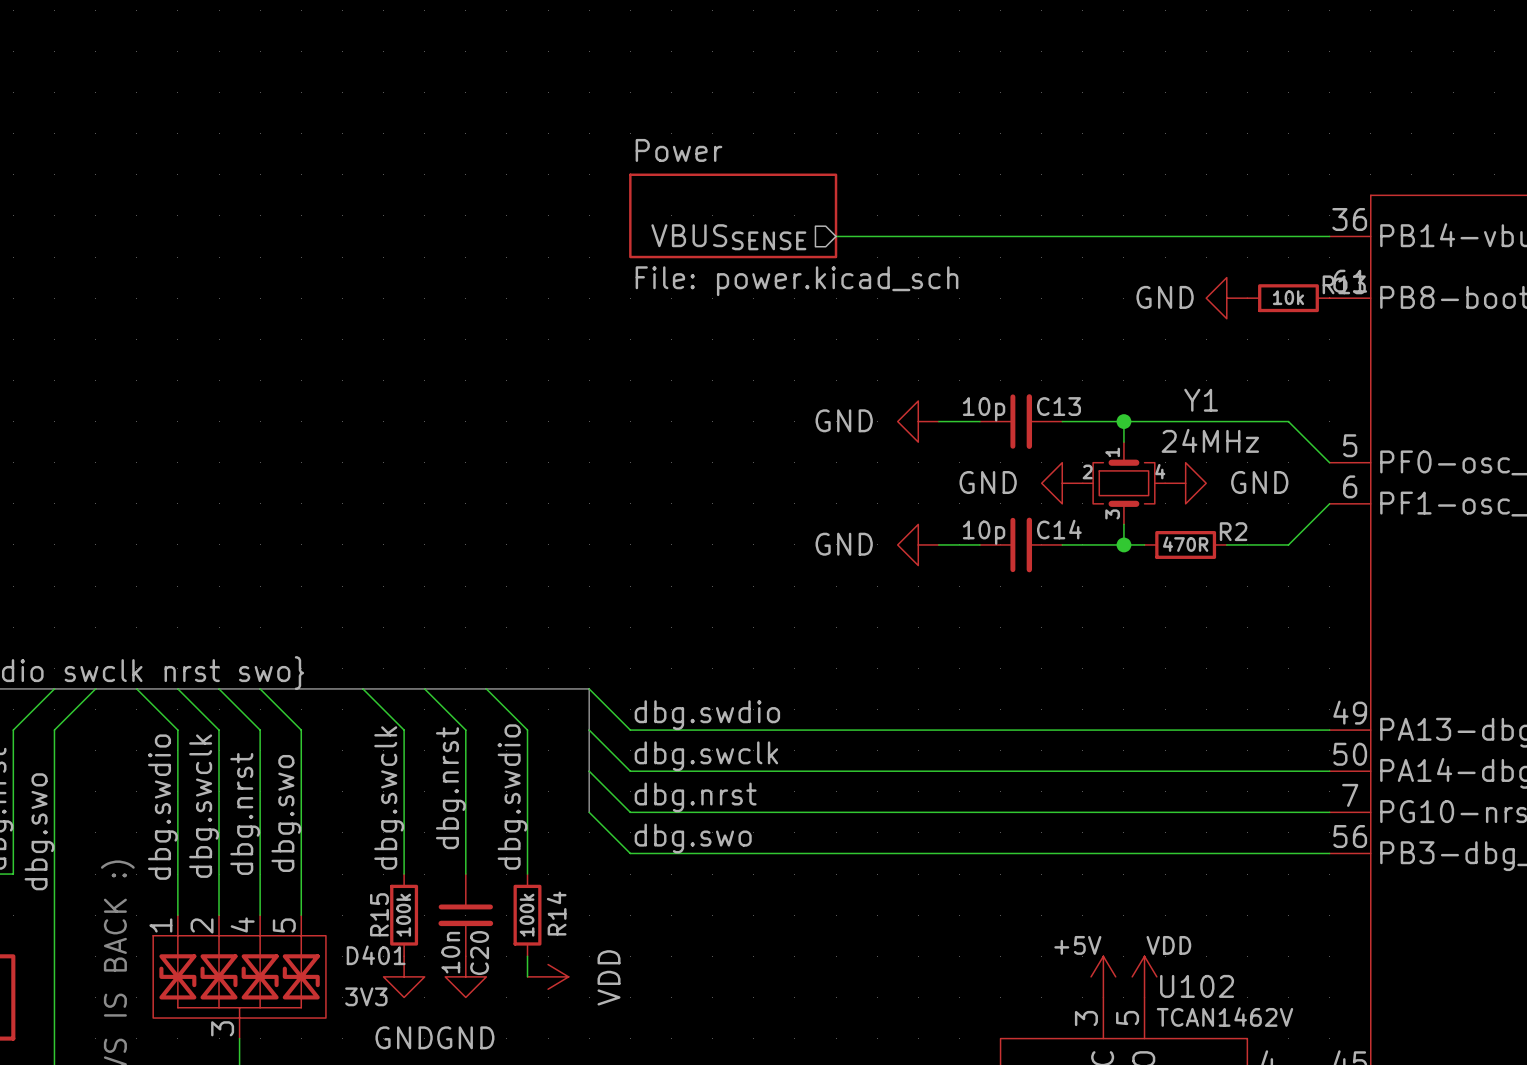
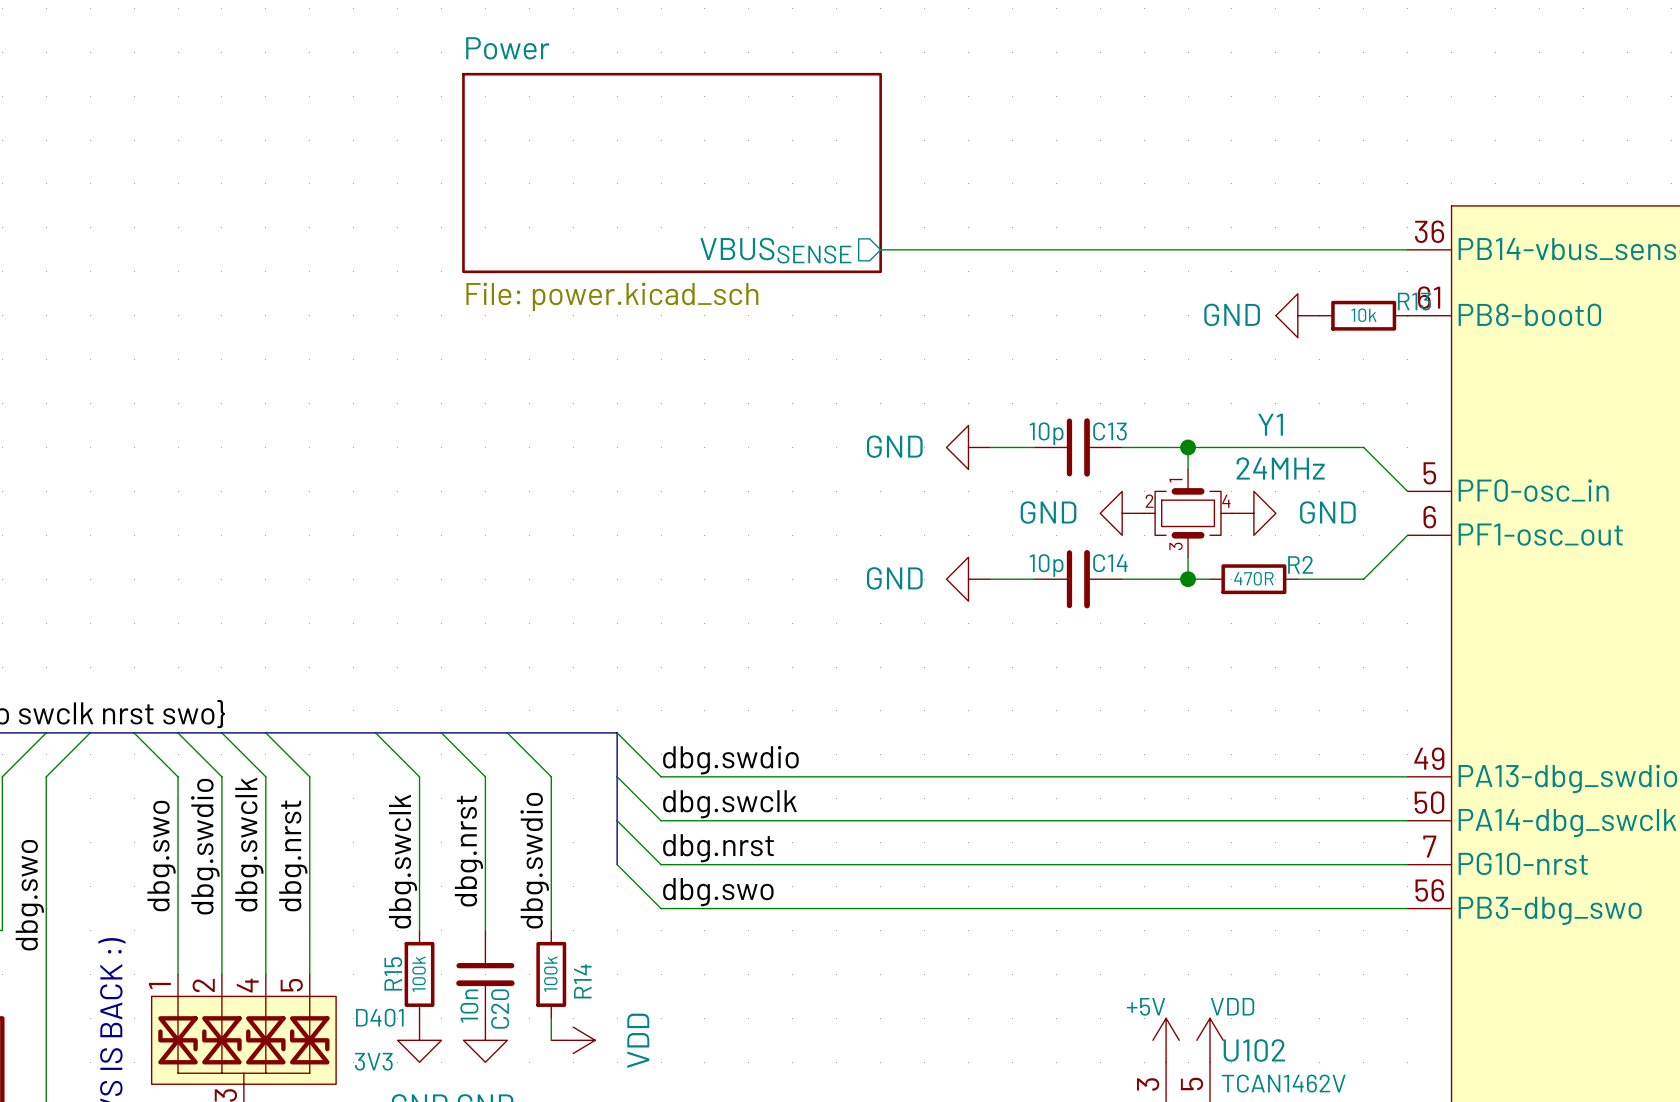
sheet Power: none -> File: power.kicad_sch (672, 173)
sheet Power: File: power.kicad_sch (733, 215) -> none
label: dbg.swclk (204, 806) -> dbg.swdio (205, 846)
label: none -> dbg.swclk (249, 844)
label: dbg.swdio (162, 807) -> dbg.swo (161, 856)
label: dbg.nrst (245, 813) -> none
label: dbg.swo (286, 813) -> dbg.nrst (293, 855)

